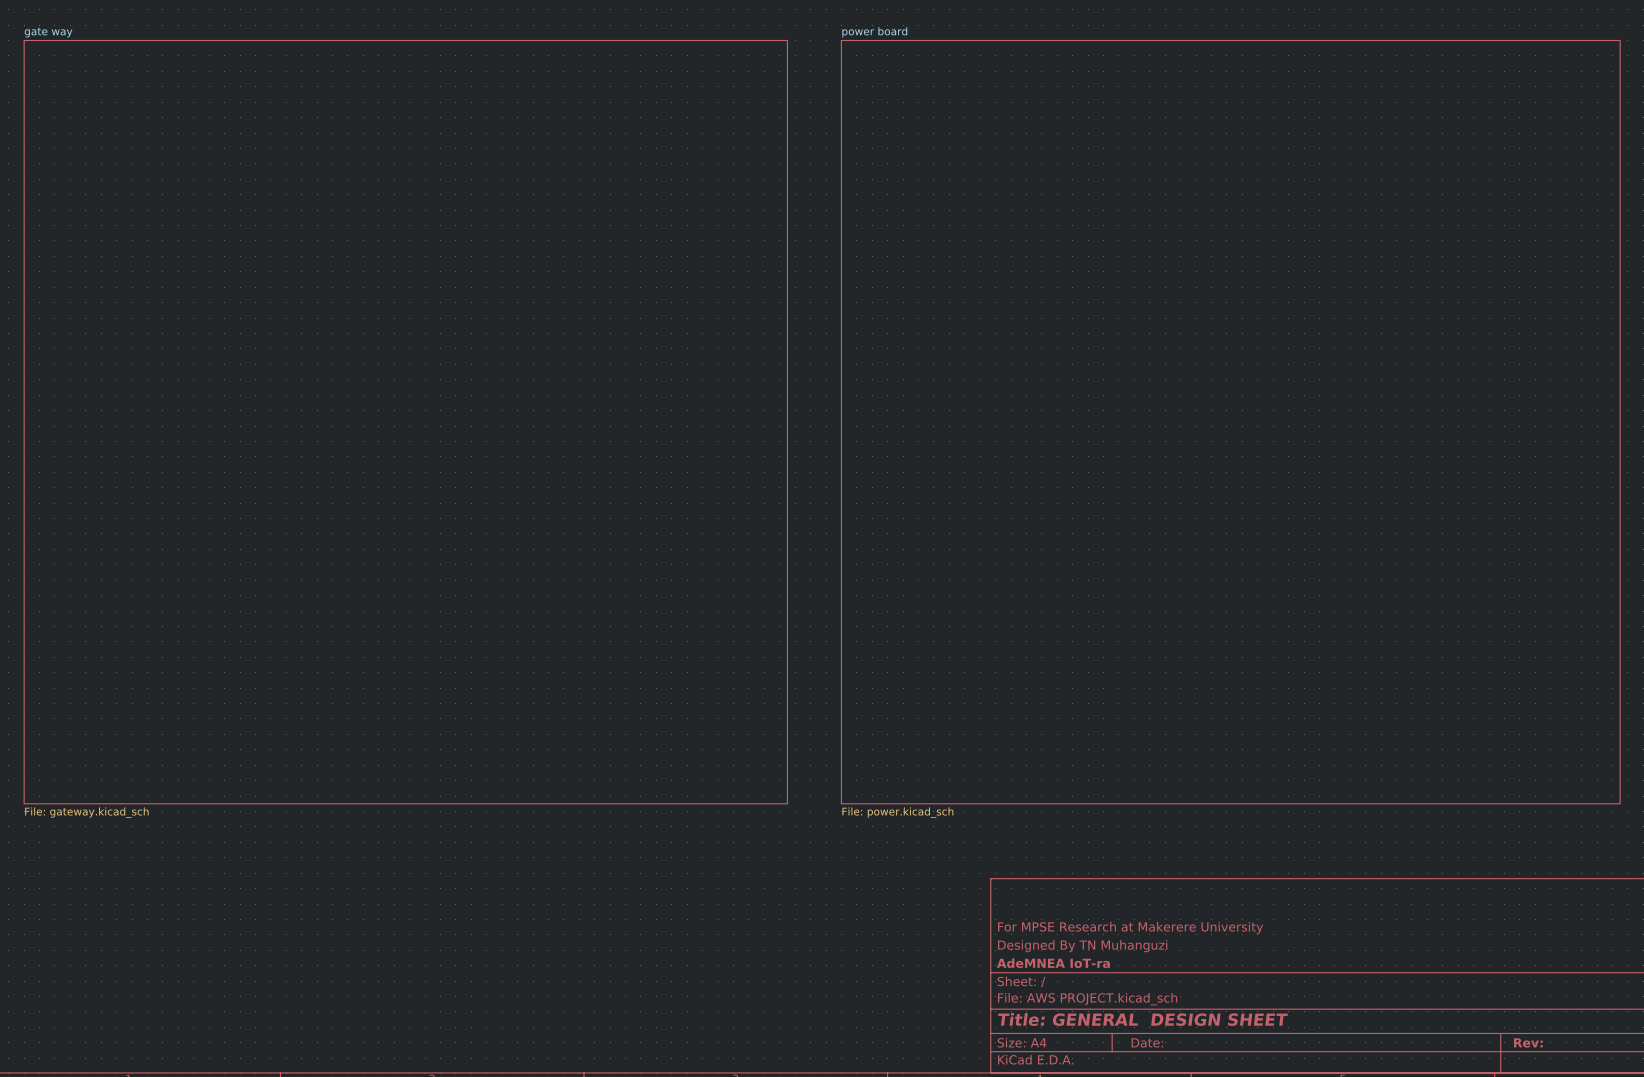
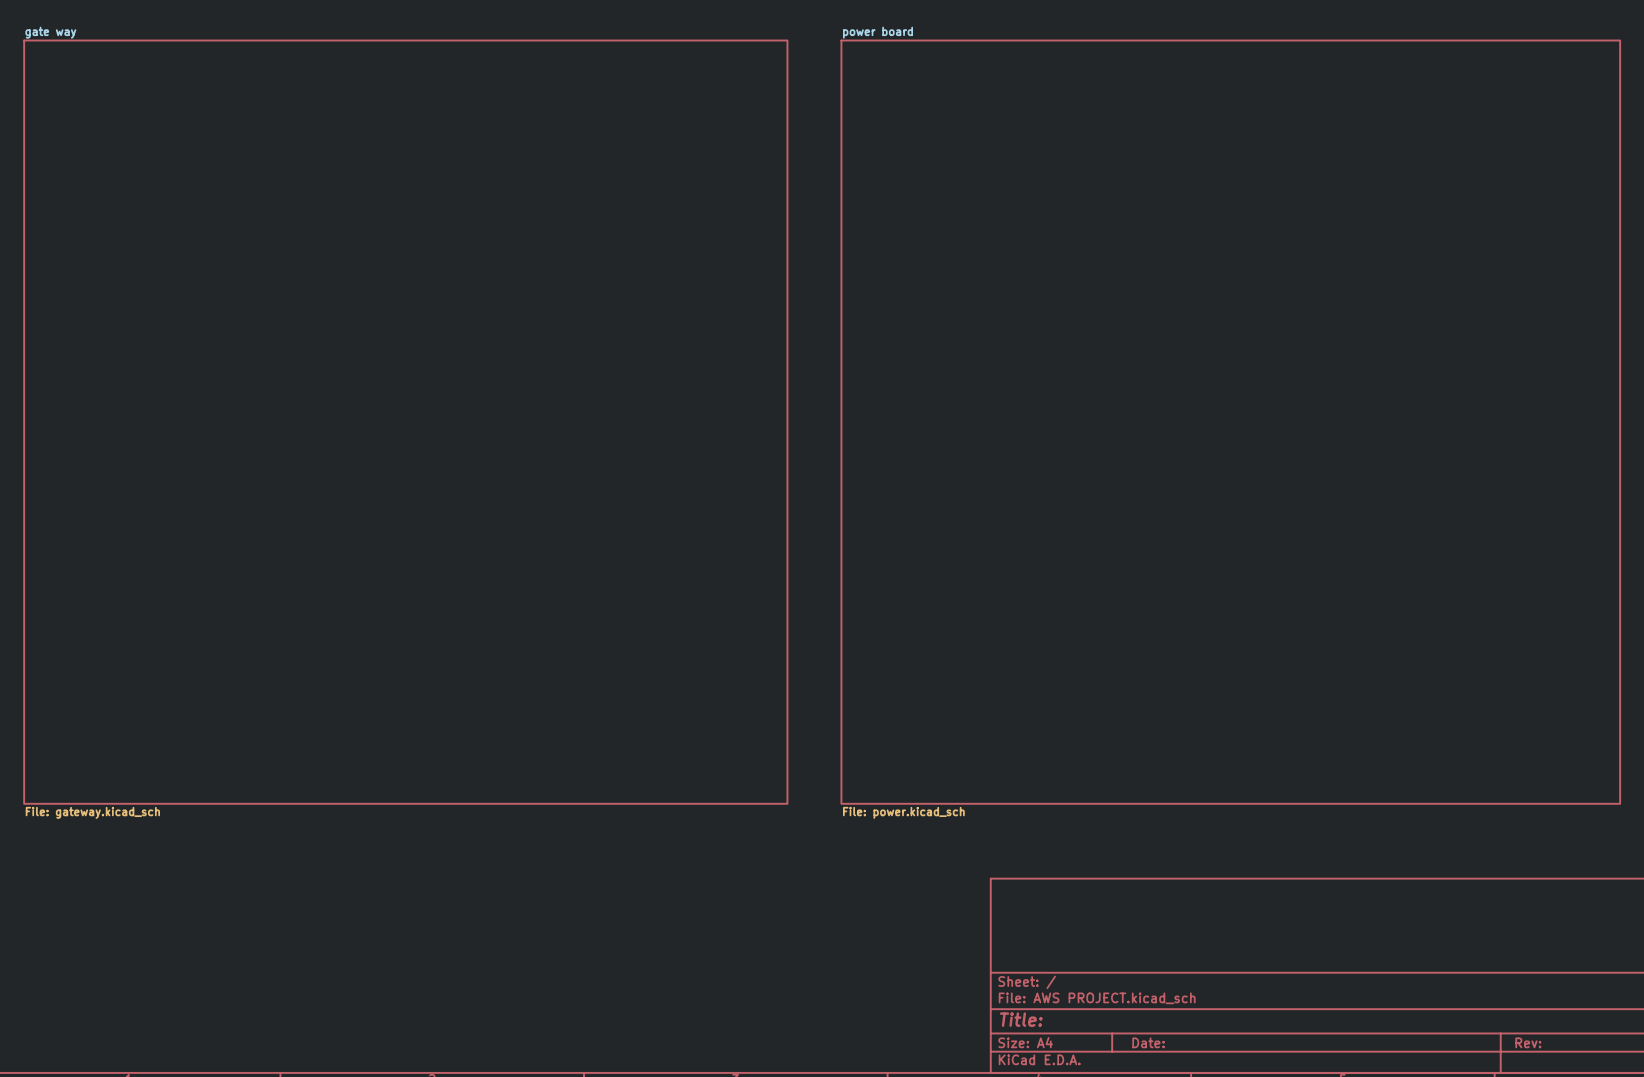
title block: For MPSE Research at Makerere University (1130, 927) -> none
title block: Designed By TN Muhanguzi (1082, 946) -> none
title block: AdeMNEA IoT-ra (1053, 963) -> none
title block: Title: GENERAL DESIGN SHEET (1143, 1019) -> Title: (1021, 1019)

